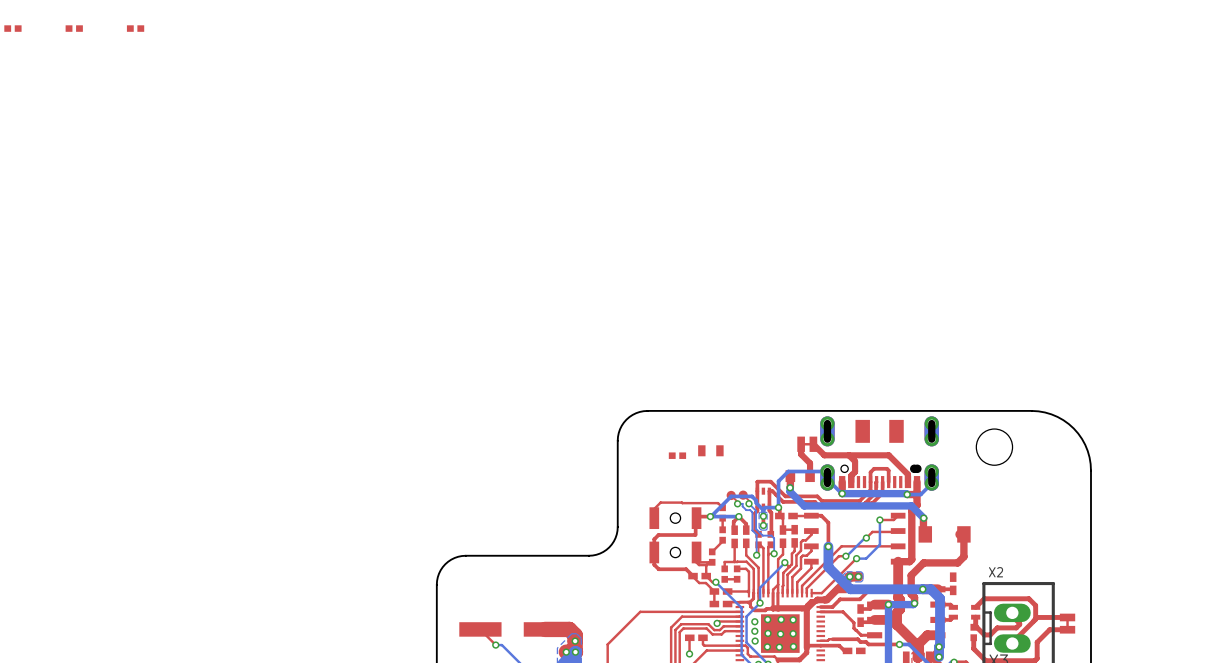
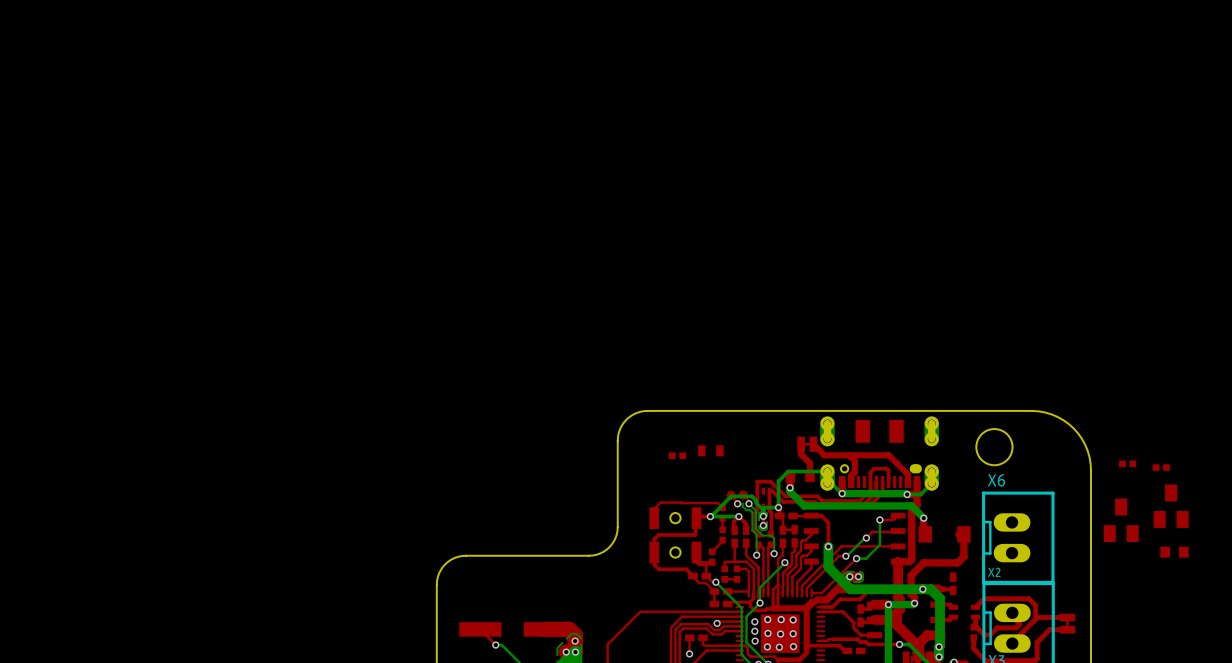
part: (12, 28) -> none
part: (74, 28) -> none
part: (135, 28) -> none
part: none -> (1127, 463)
part: none -> (1161, 467)
part: none -> (1171, 506)
part: none -> (1121, 520)
X6: none -> (1018, 537)
part: none -> (1174, 552)

